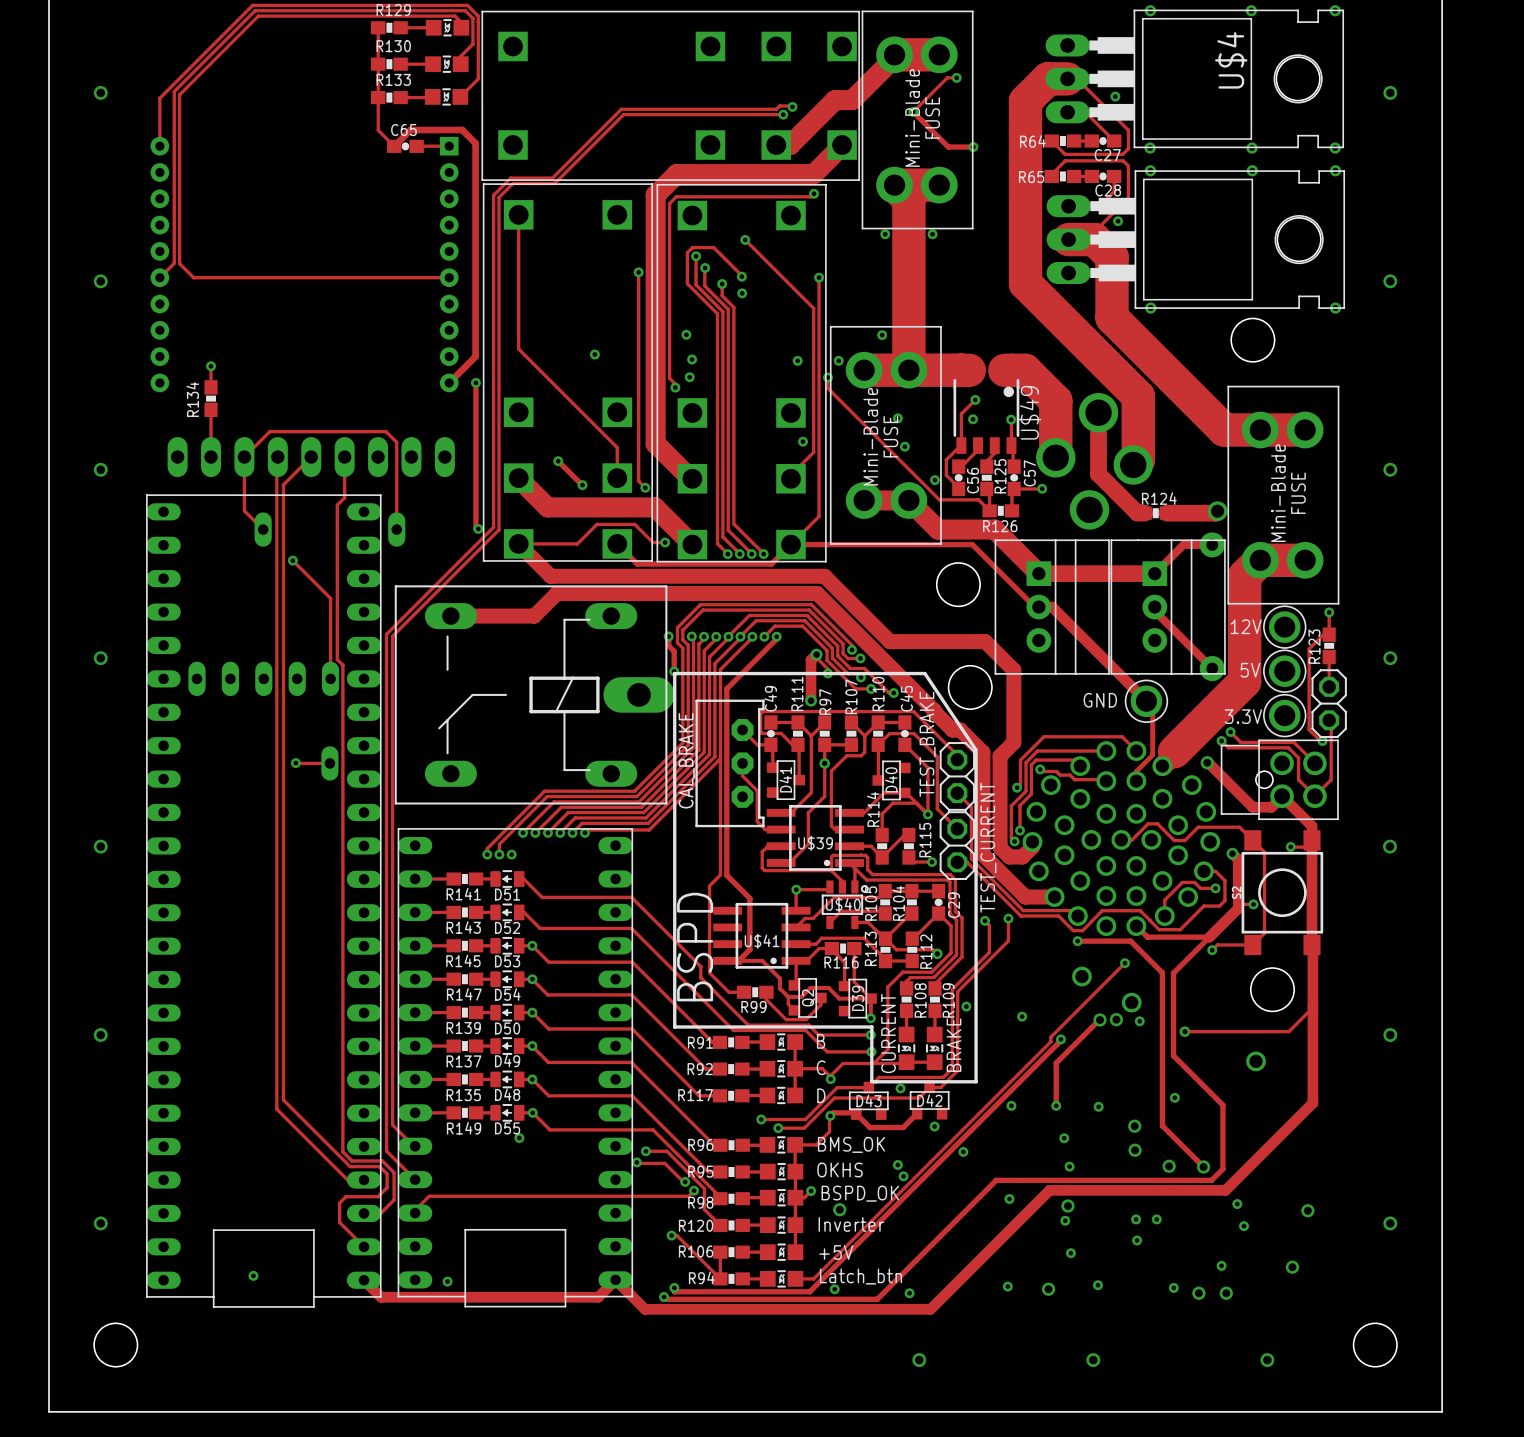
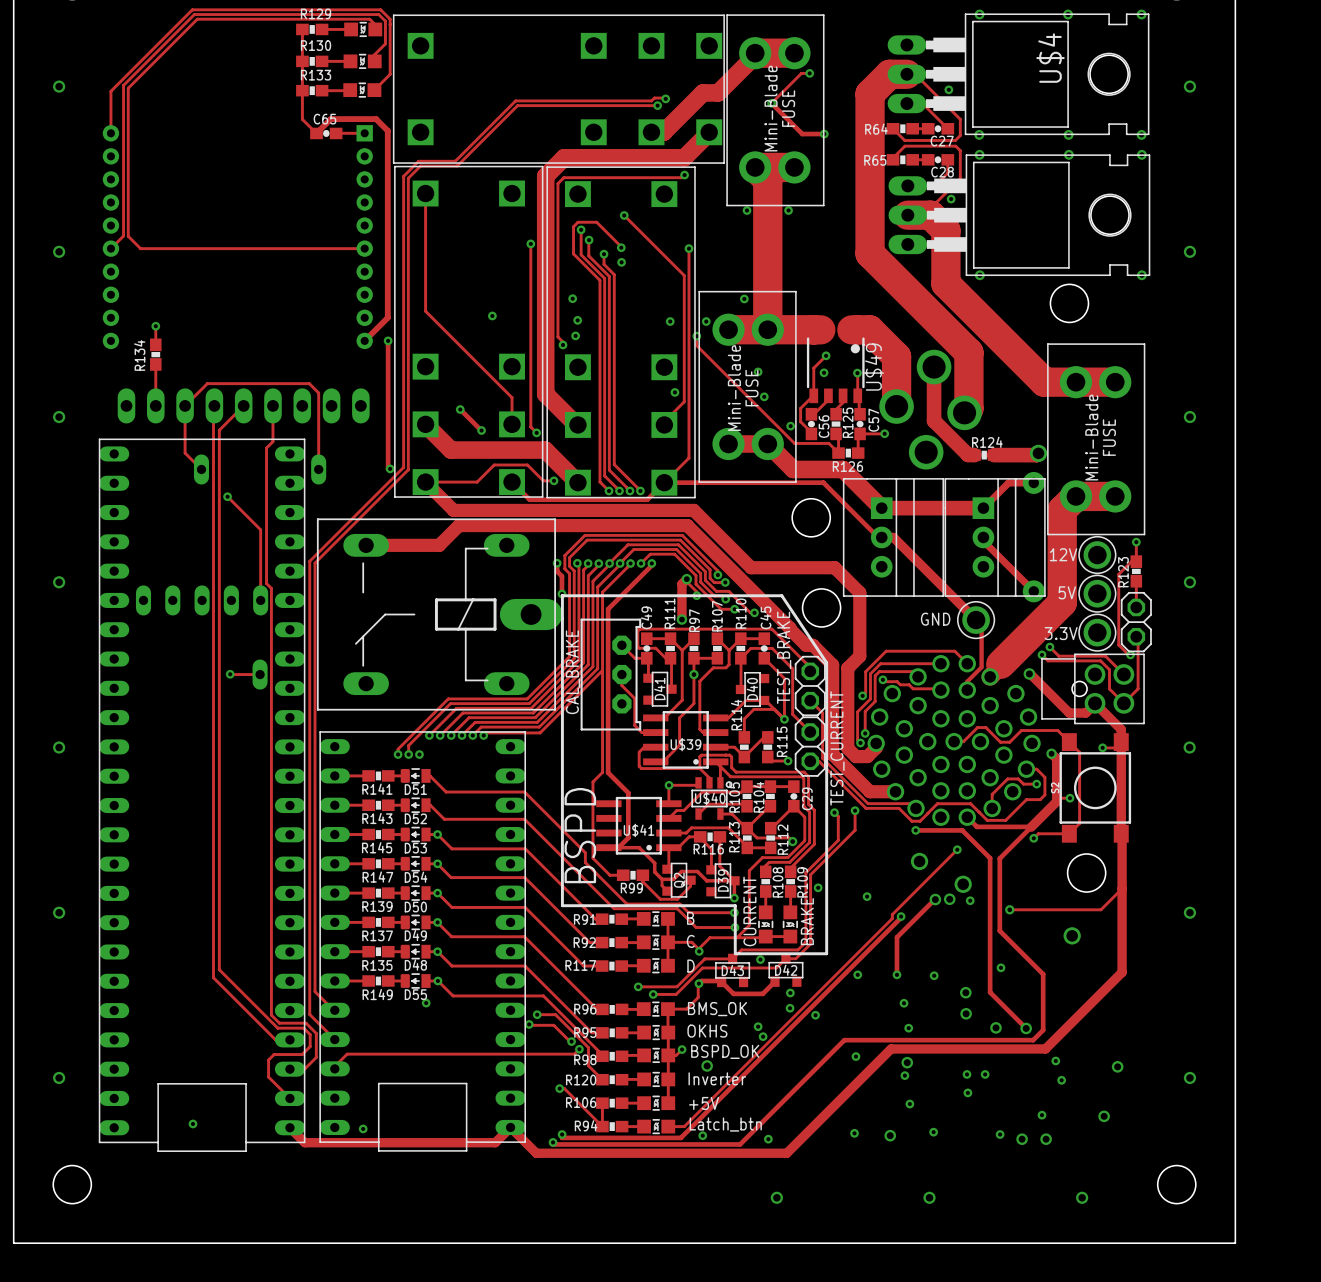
via: none -> (790, 1008)

